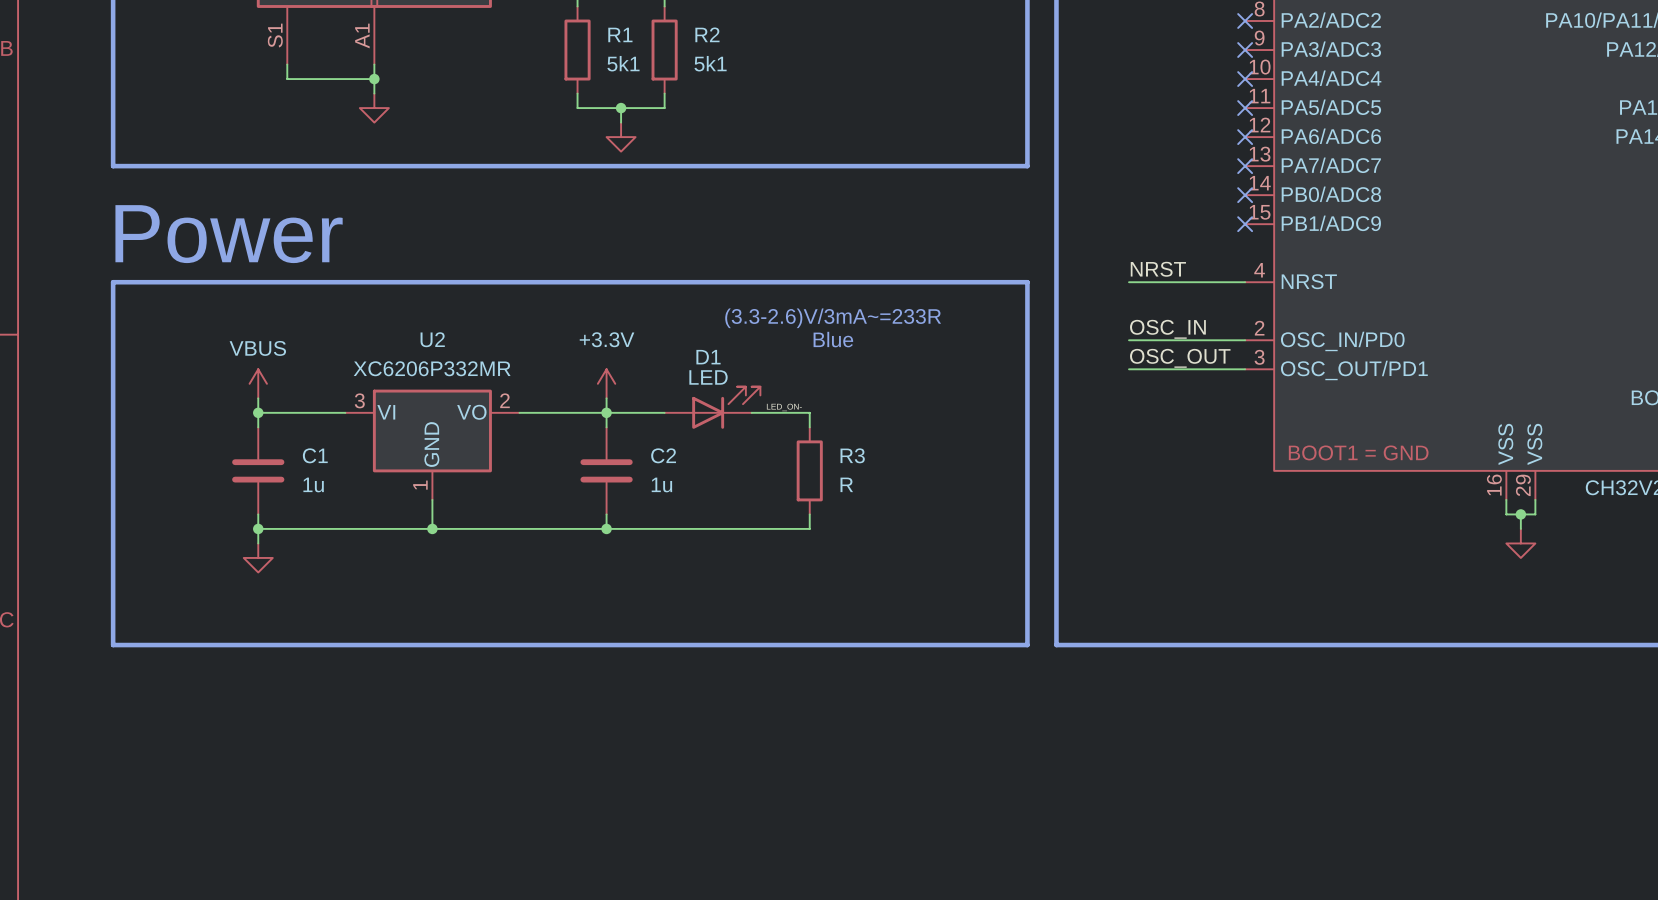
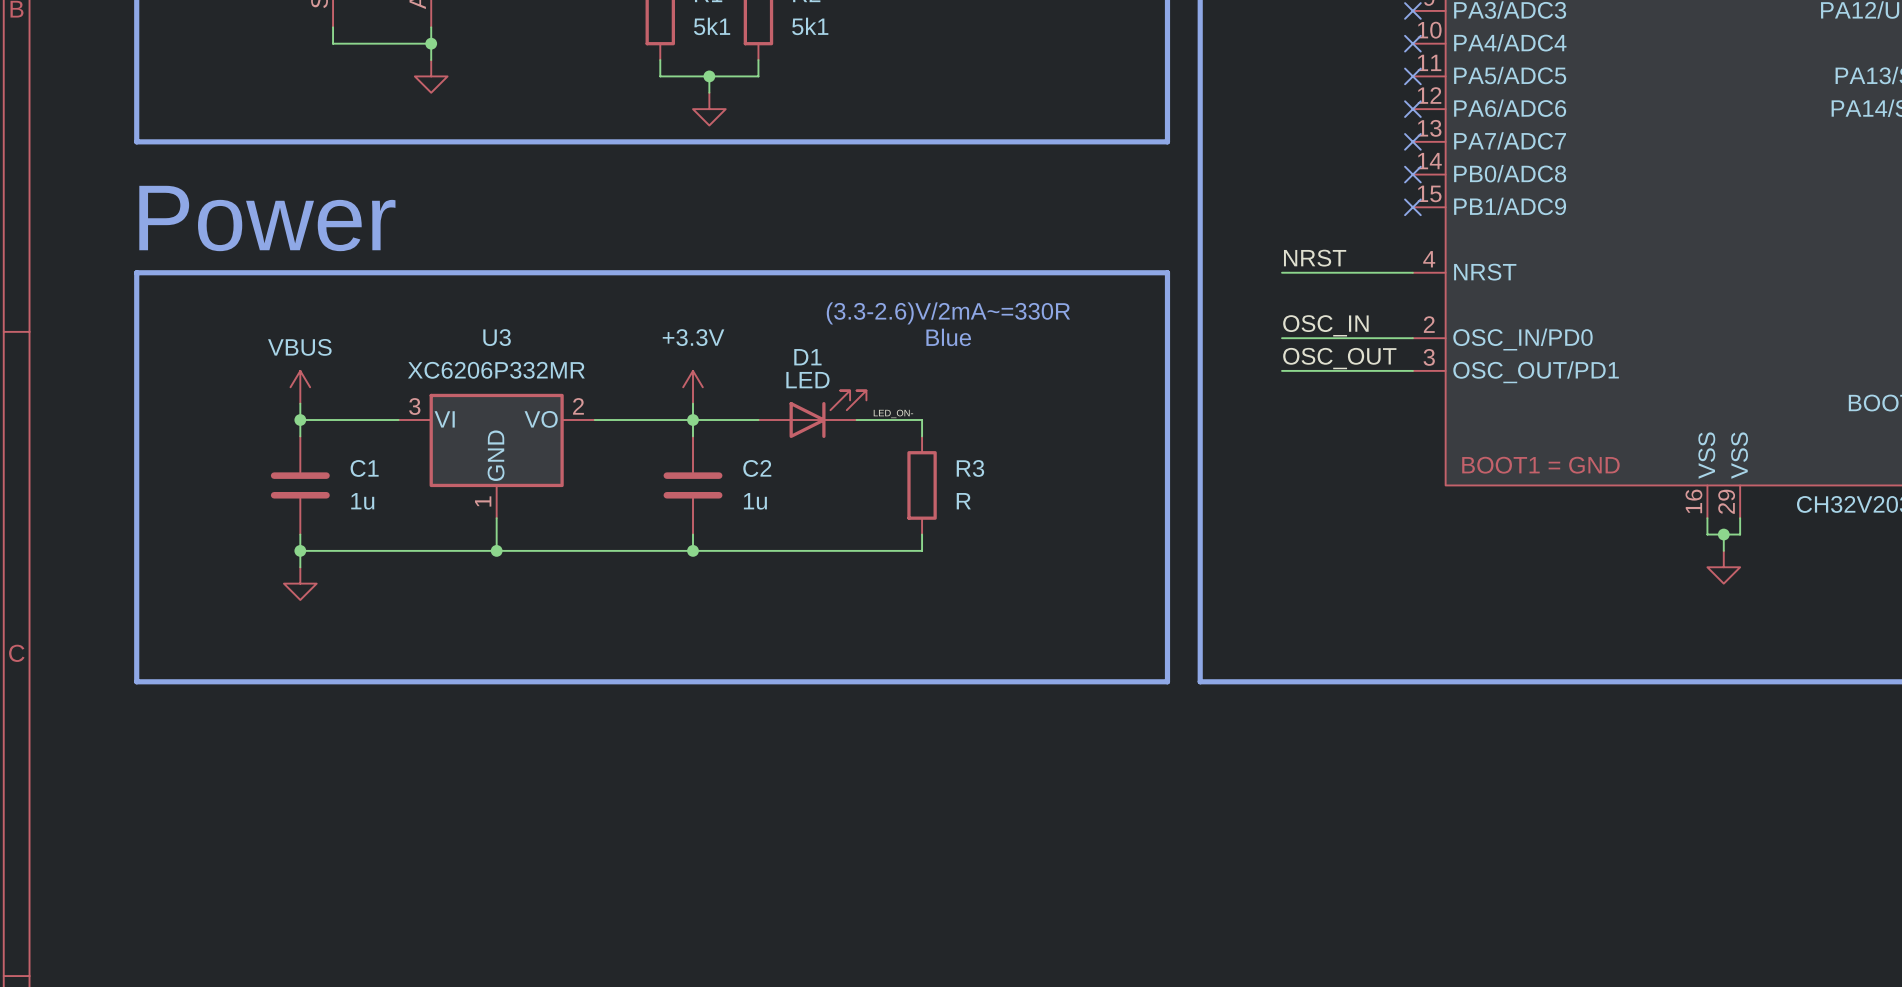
text: (3.3-2.6)V/3mA~=233R (833, 318) -> (3.3-2.6)V/2mA~=330R (948, 313)
U2 name: U2 (432, 339) -> U3 (497, 337)

